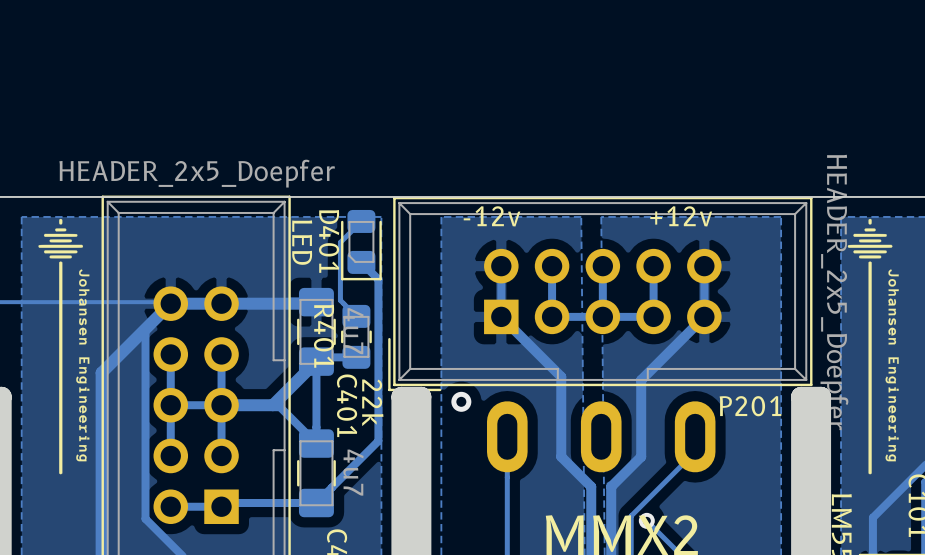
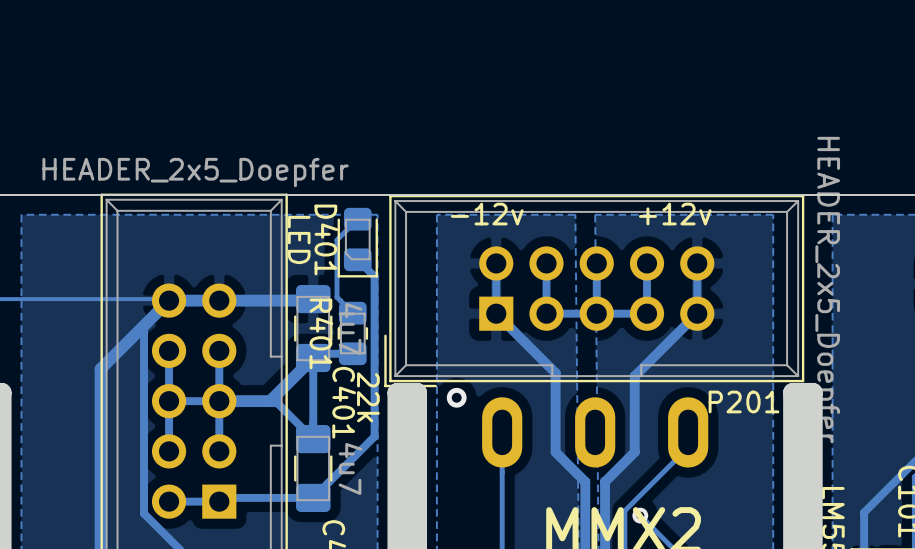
drawing: [38, 218, 90, 475] -> none
drawing: [847, 218, 899, 475] -> none

